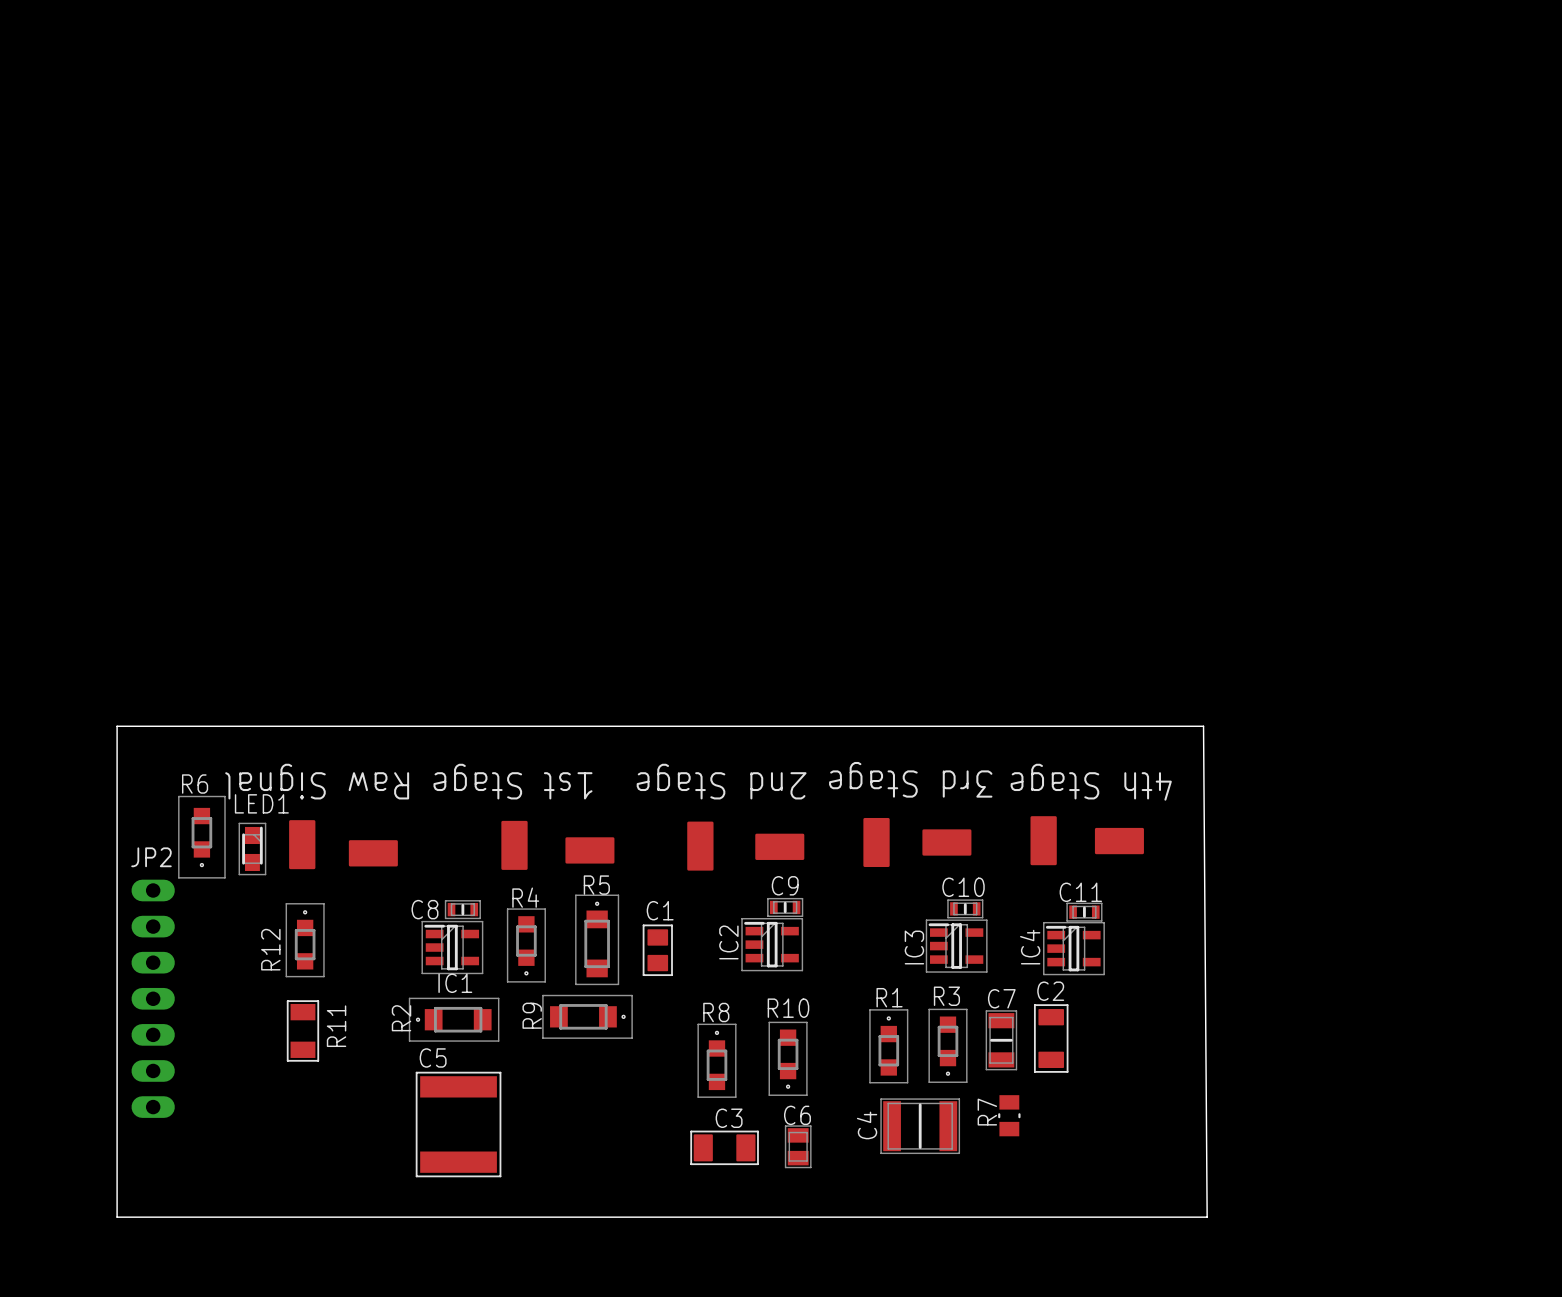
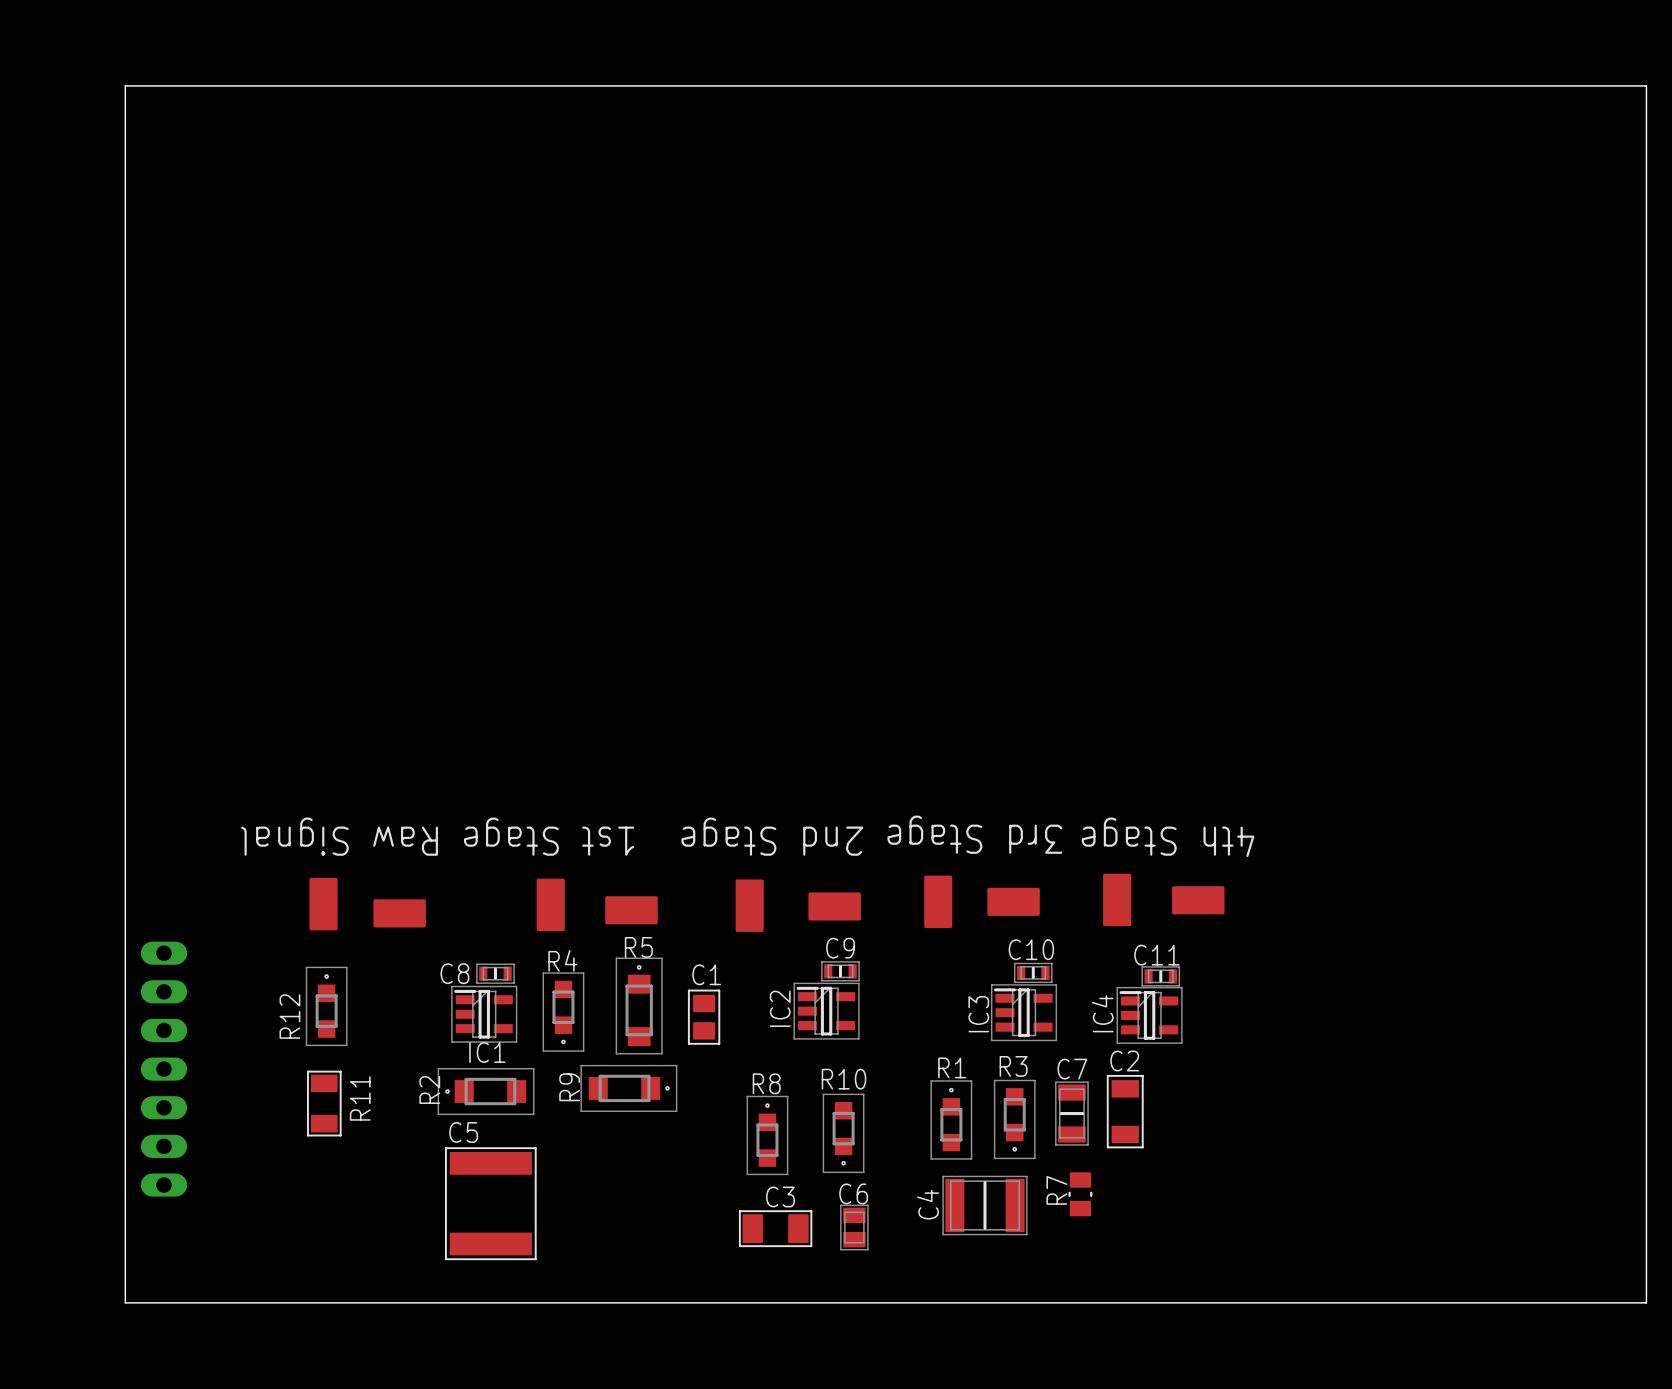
board edge: (117, 726) (1203, 726) (1207, 1217) -> (125, 777) (125, 85) (1646, 85) (1646, 1302) (1292, 1302)
R6: (201, 837) -> none
LED1: (252, 848) -> none
JP2 name: JP2 (151, 857) -> none

